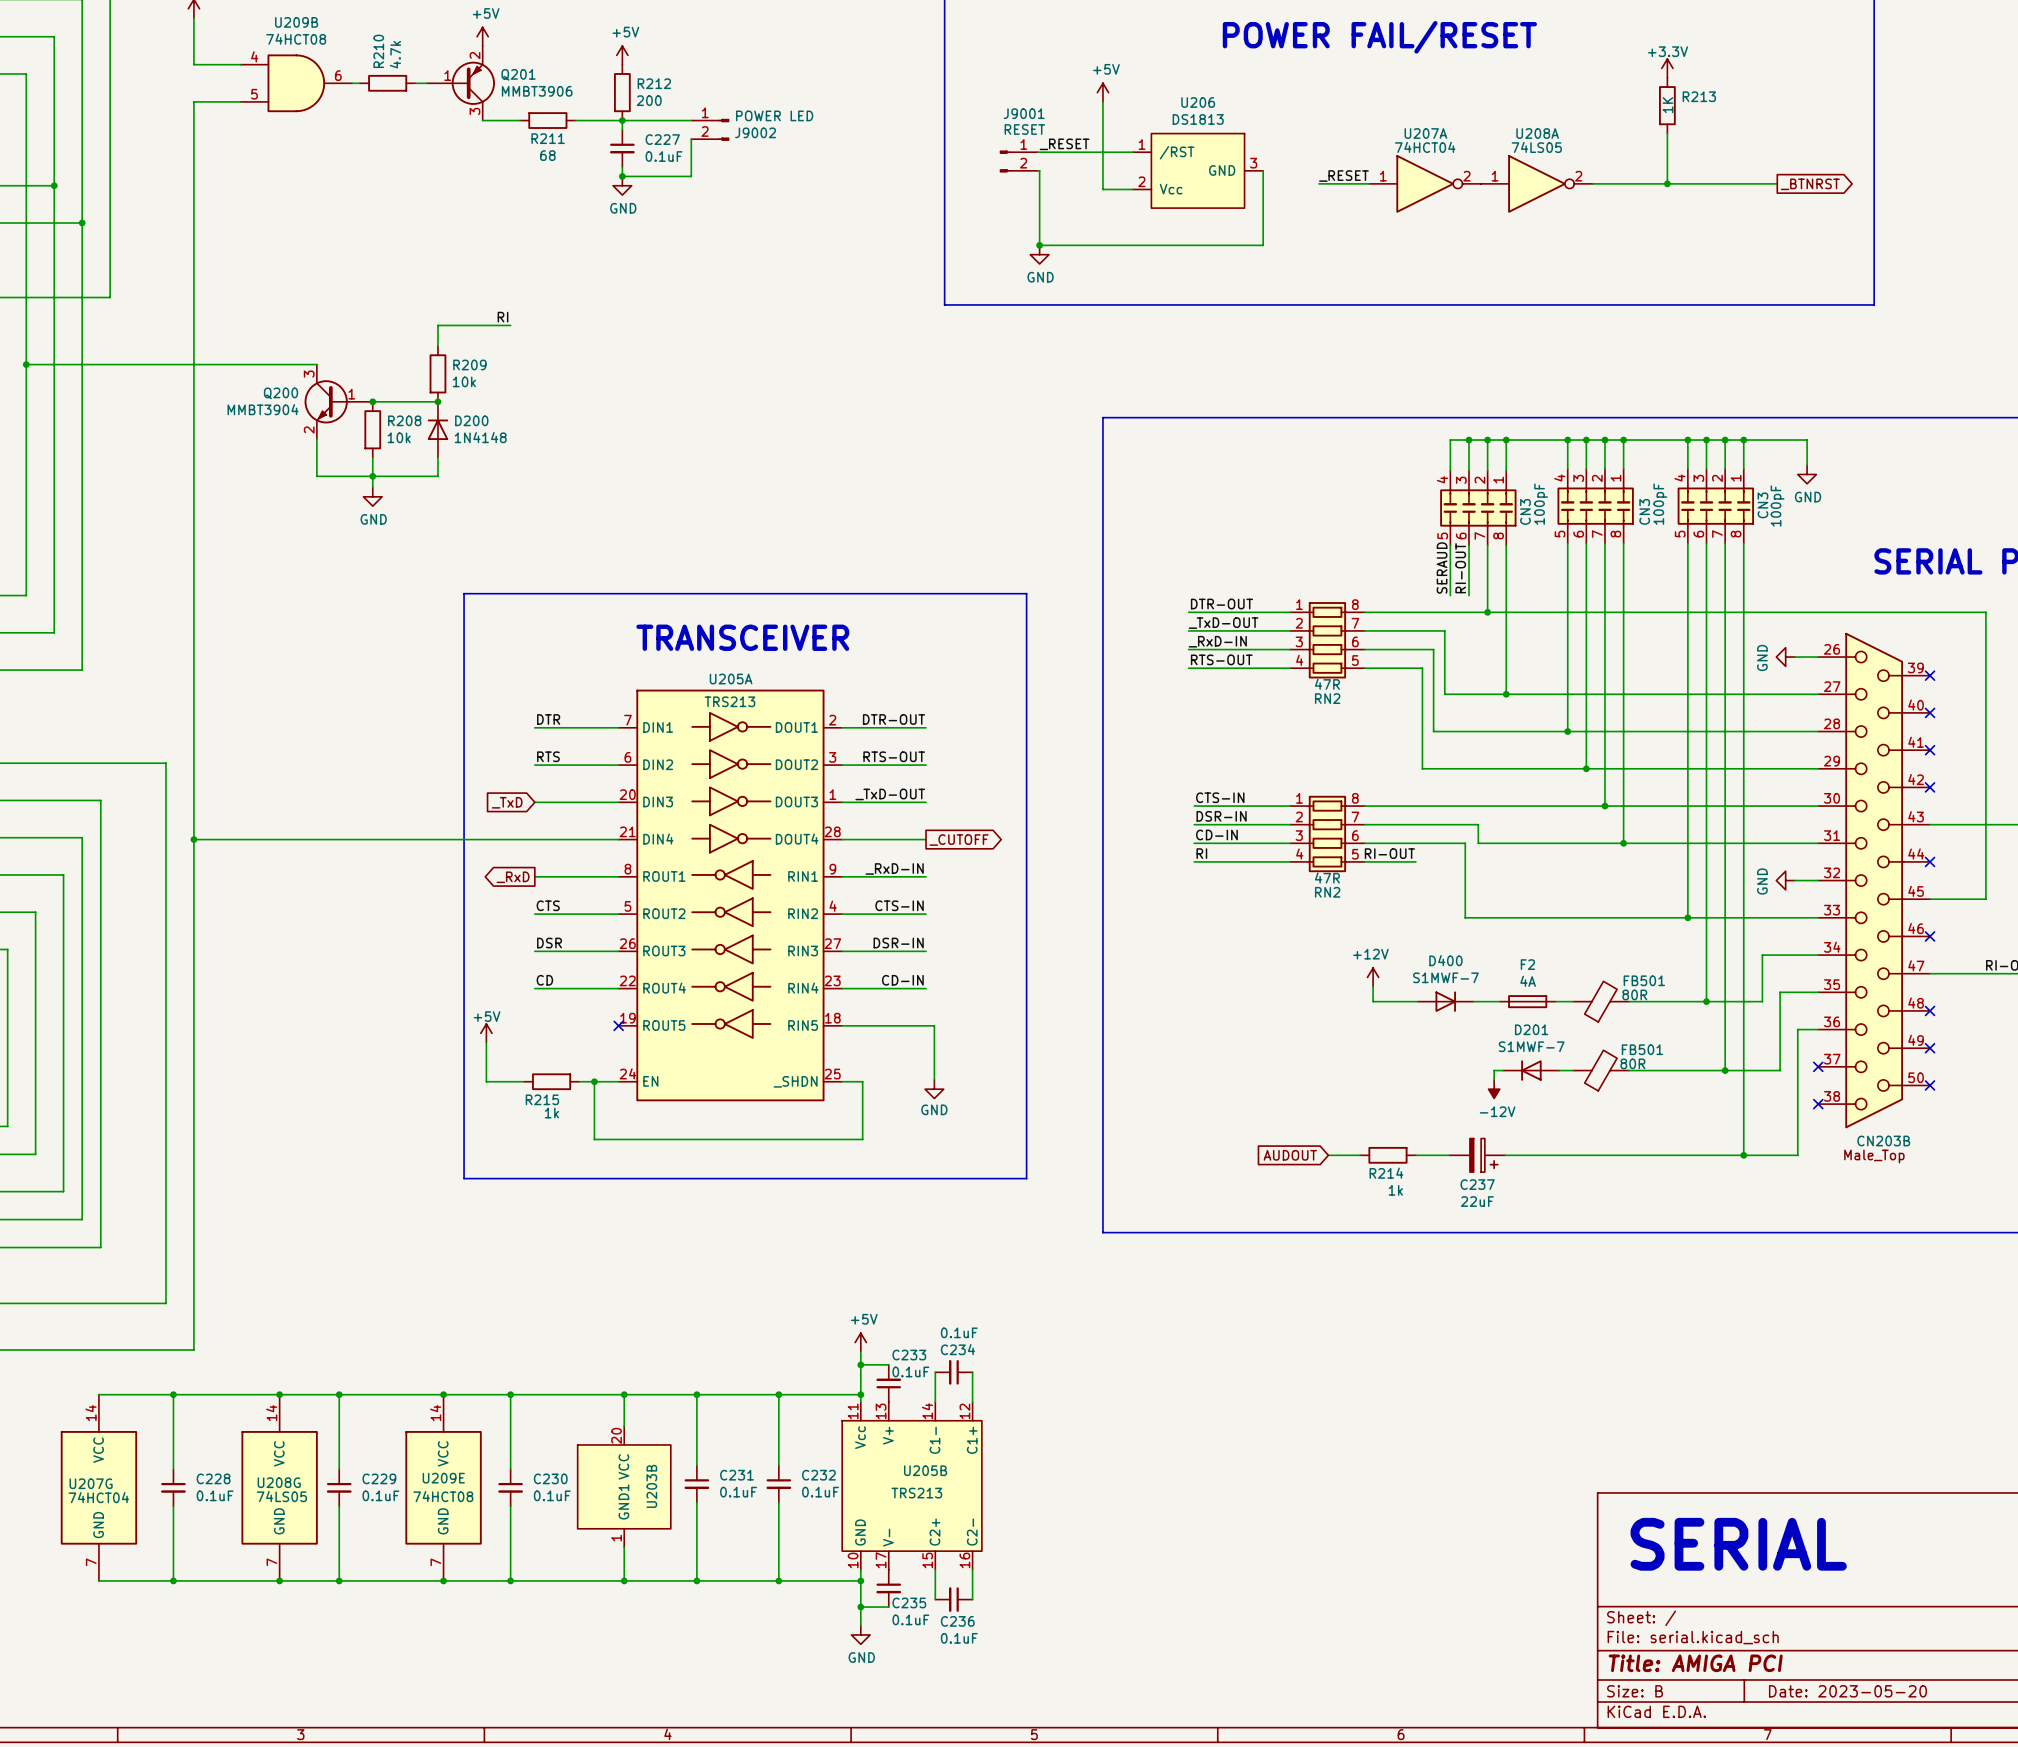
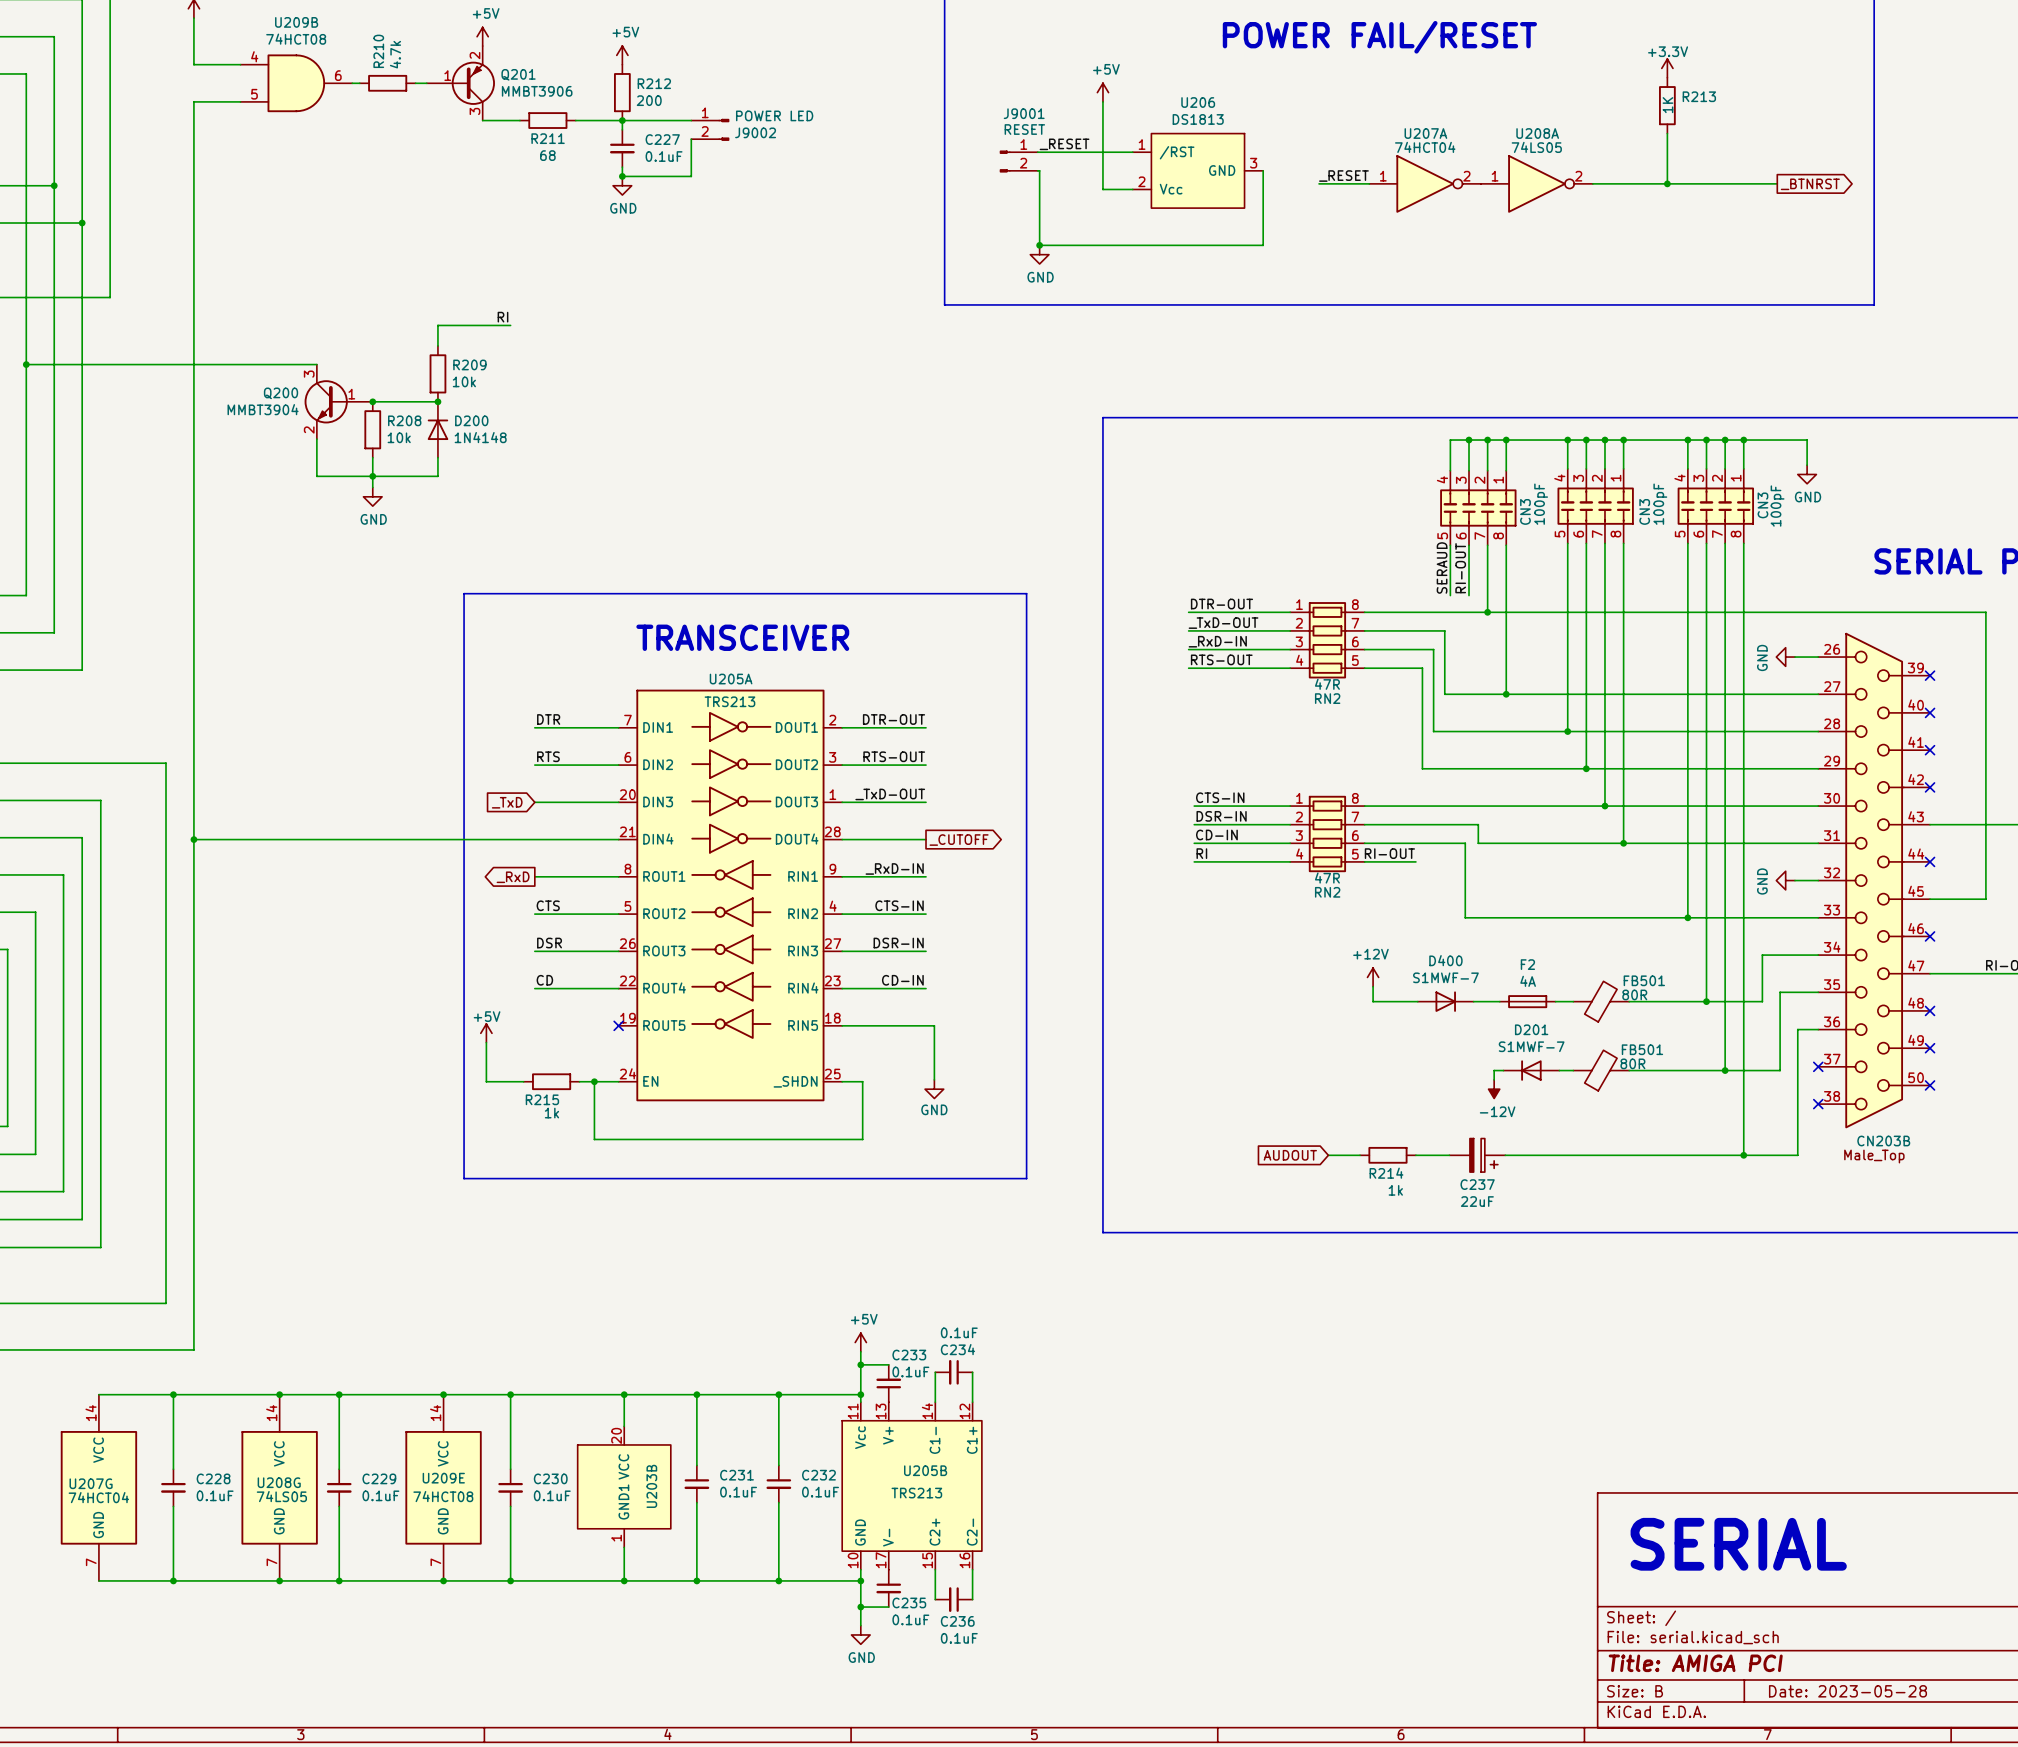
title block: Date: 2023-05-20 (1847, 1691) -> Date: 2023-05-28 (1847, 1691)

